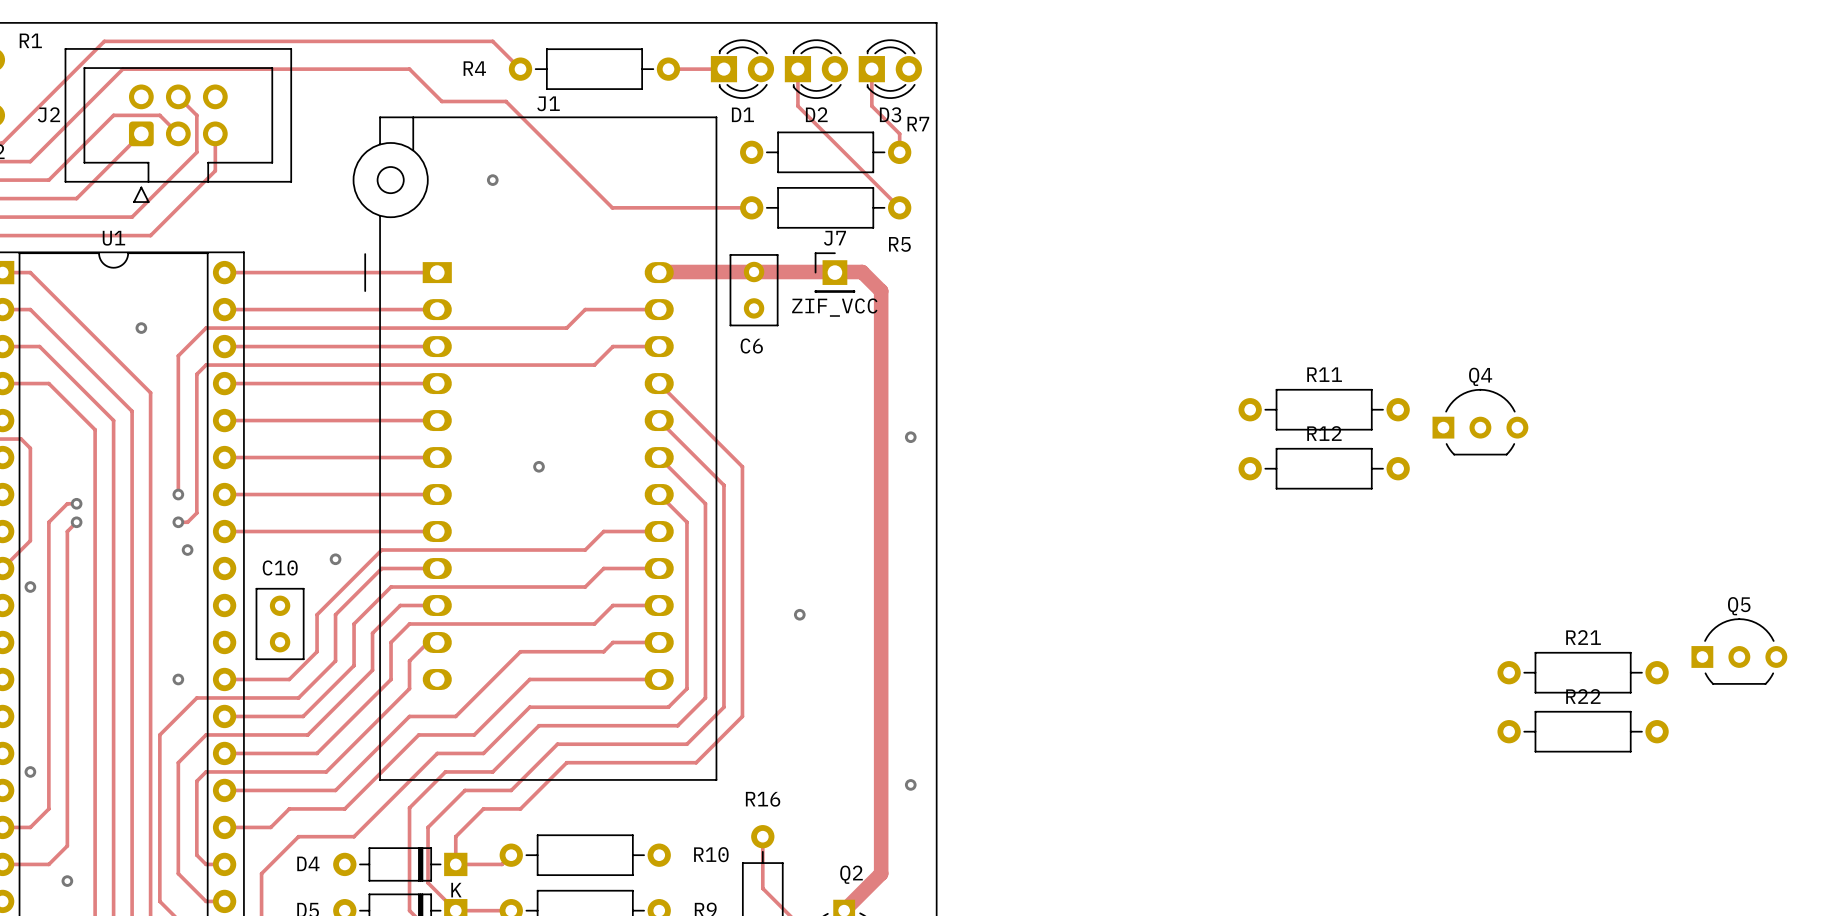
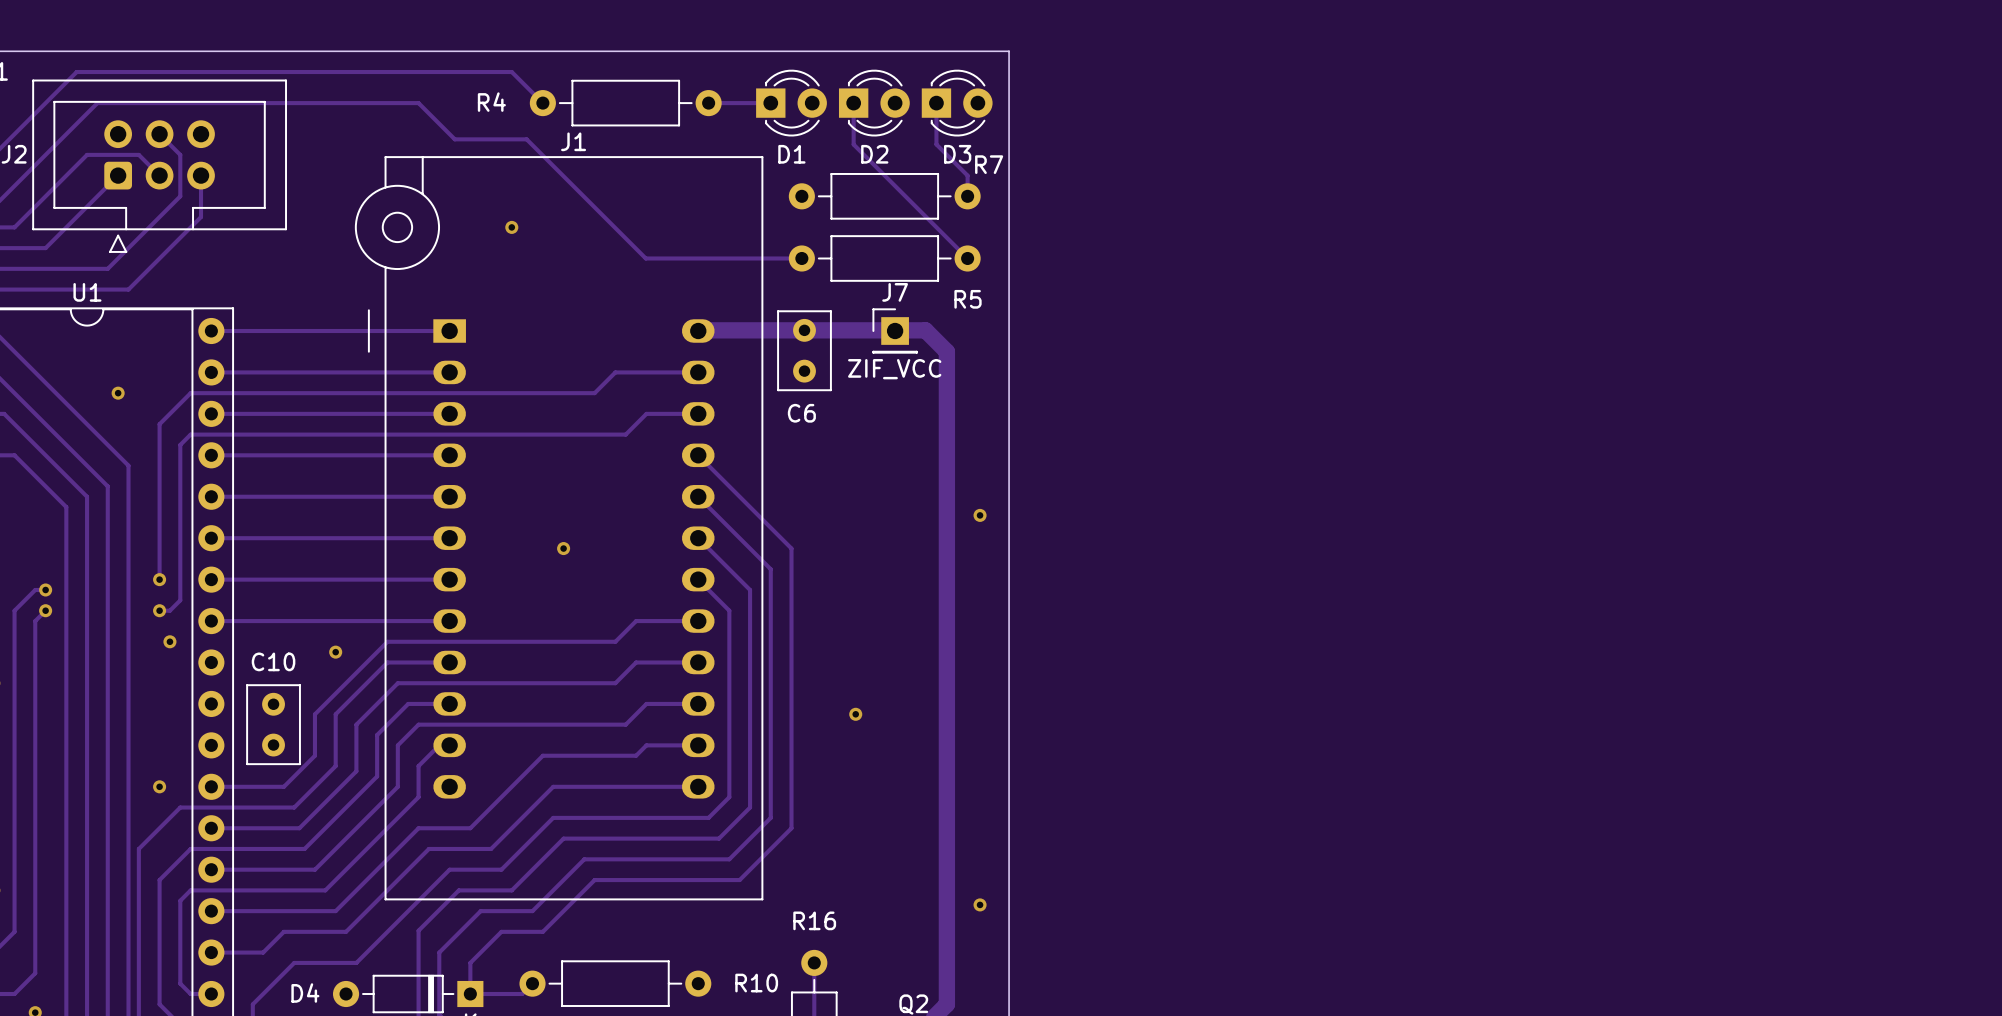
R11: (1324, 409) -> none
Q4: (1480, 422) -> none
R12: (1324, 468) -> none
Q5: (1739, 651) -> none
R21: (1583, 672) -> none
R22: (1583, 731) -> none

